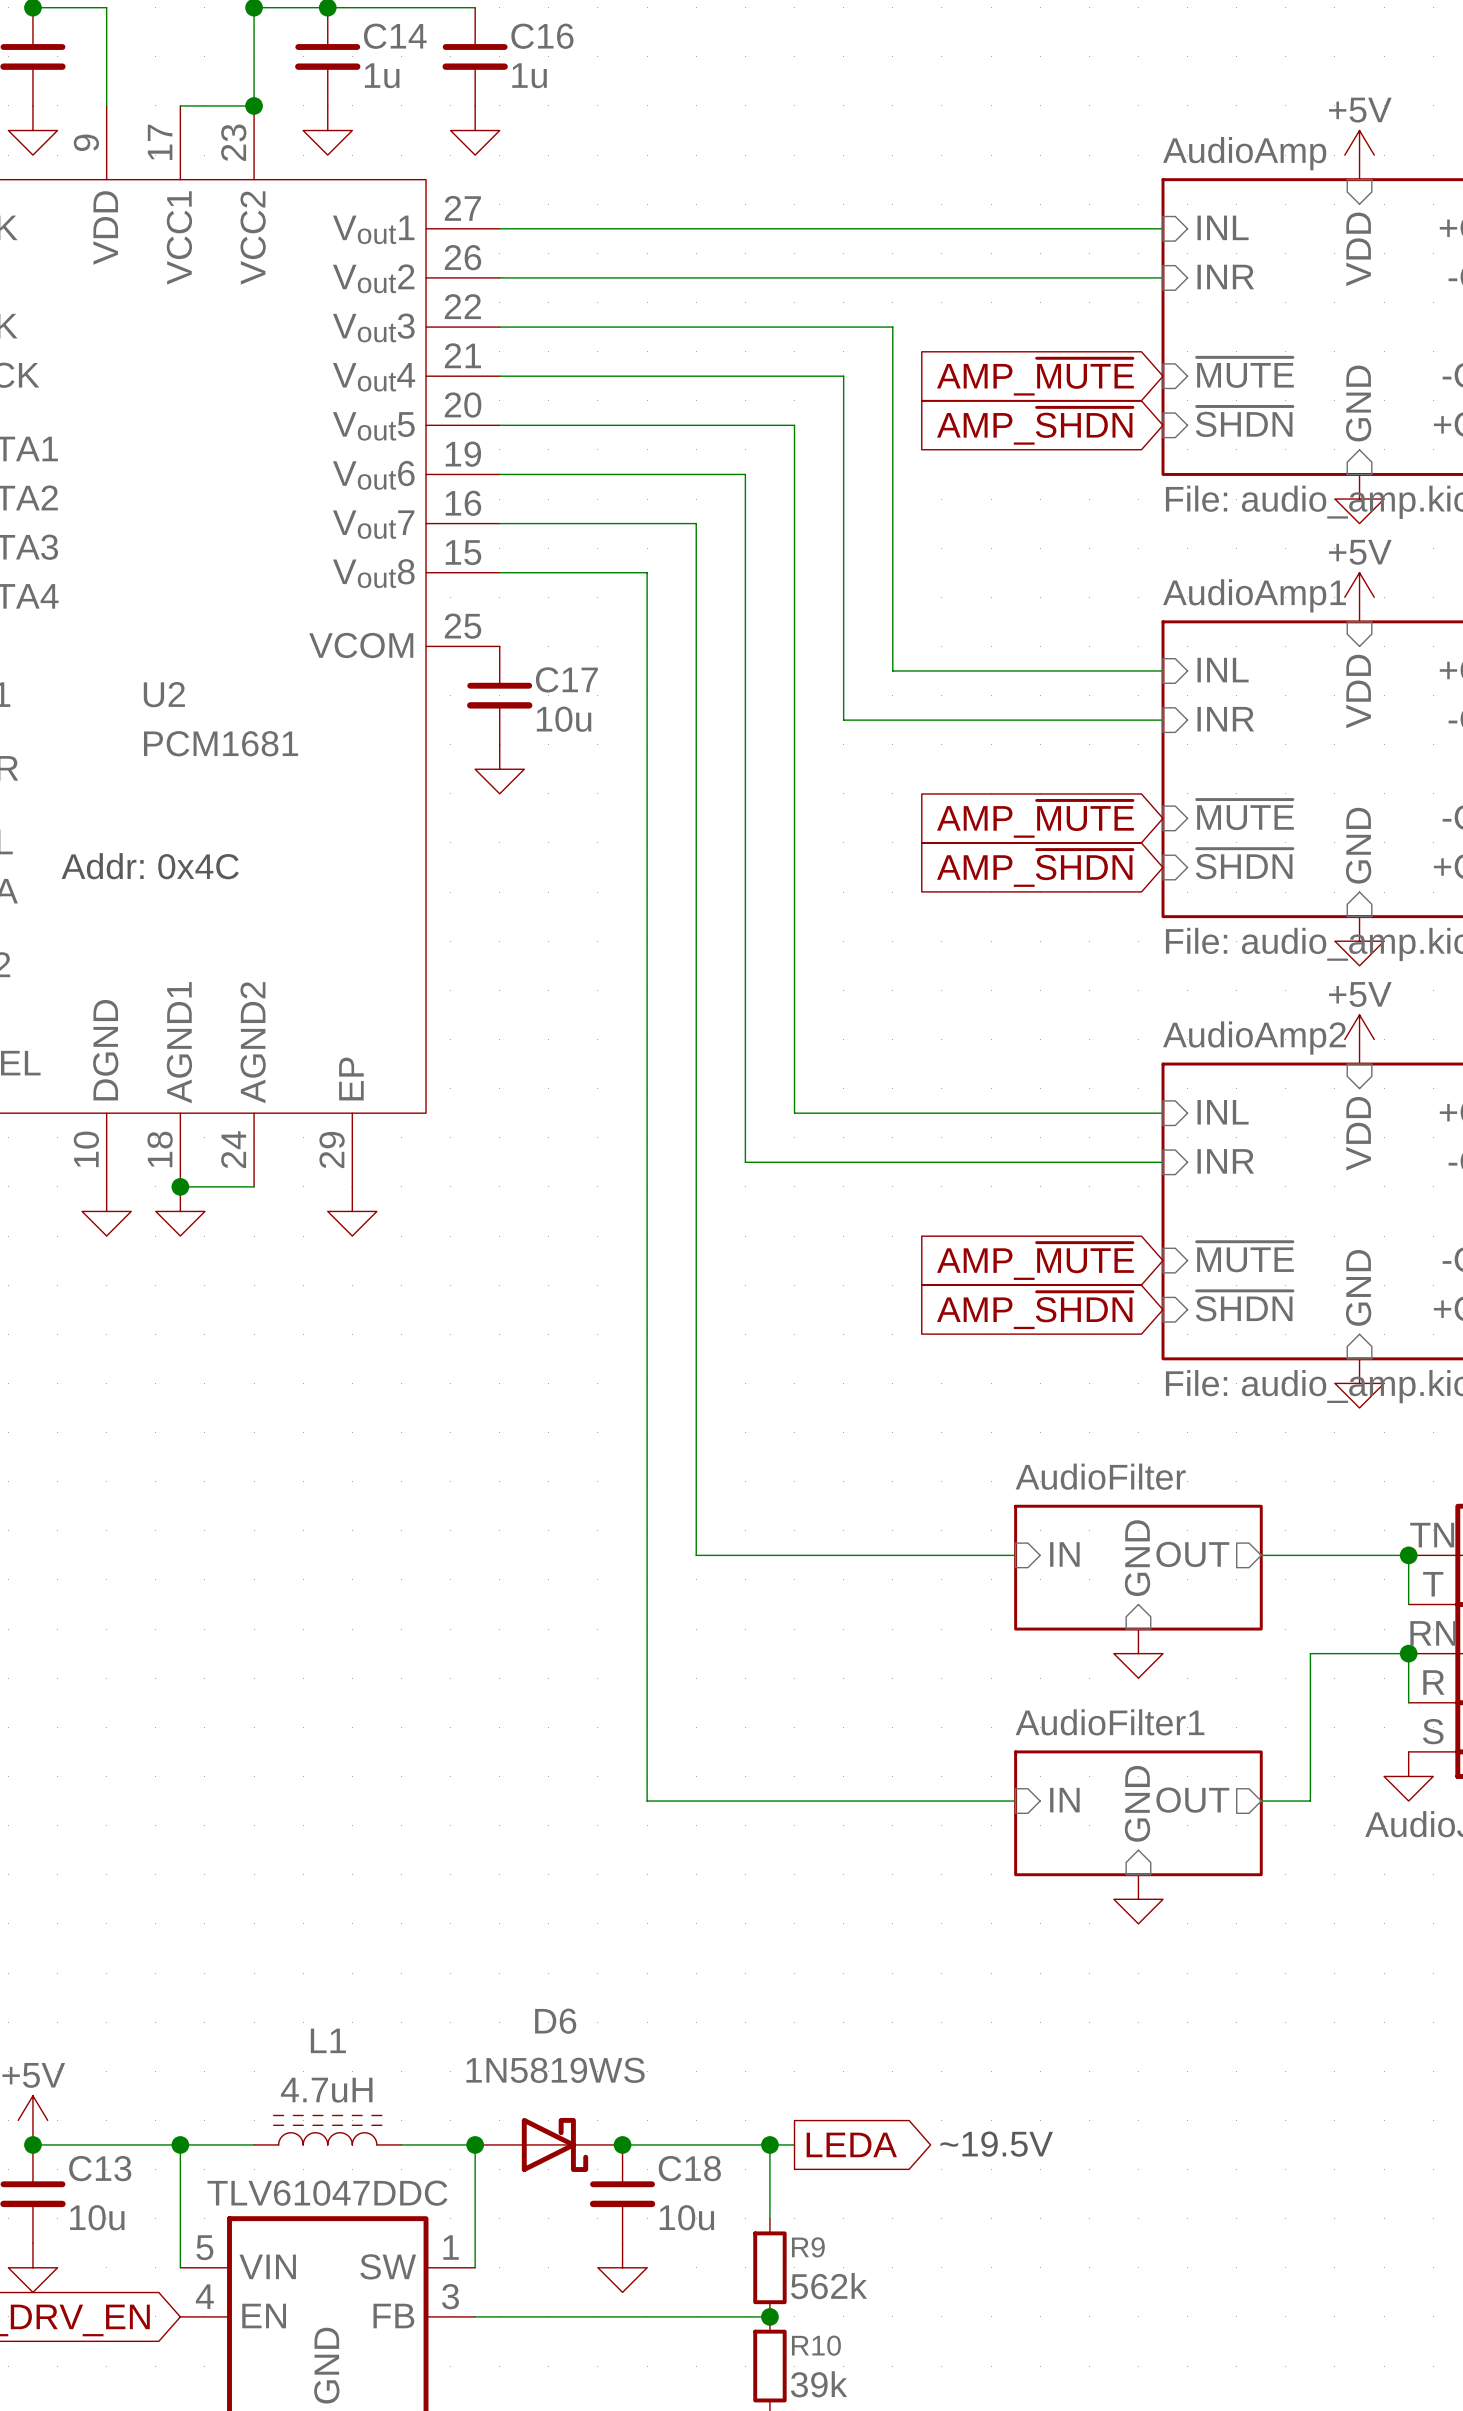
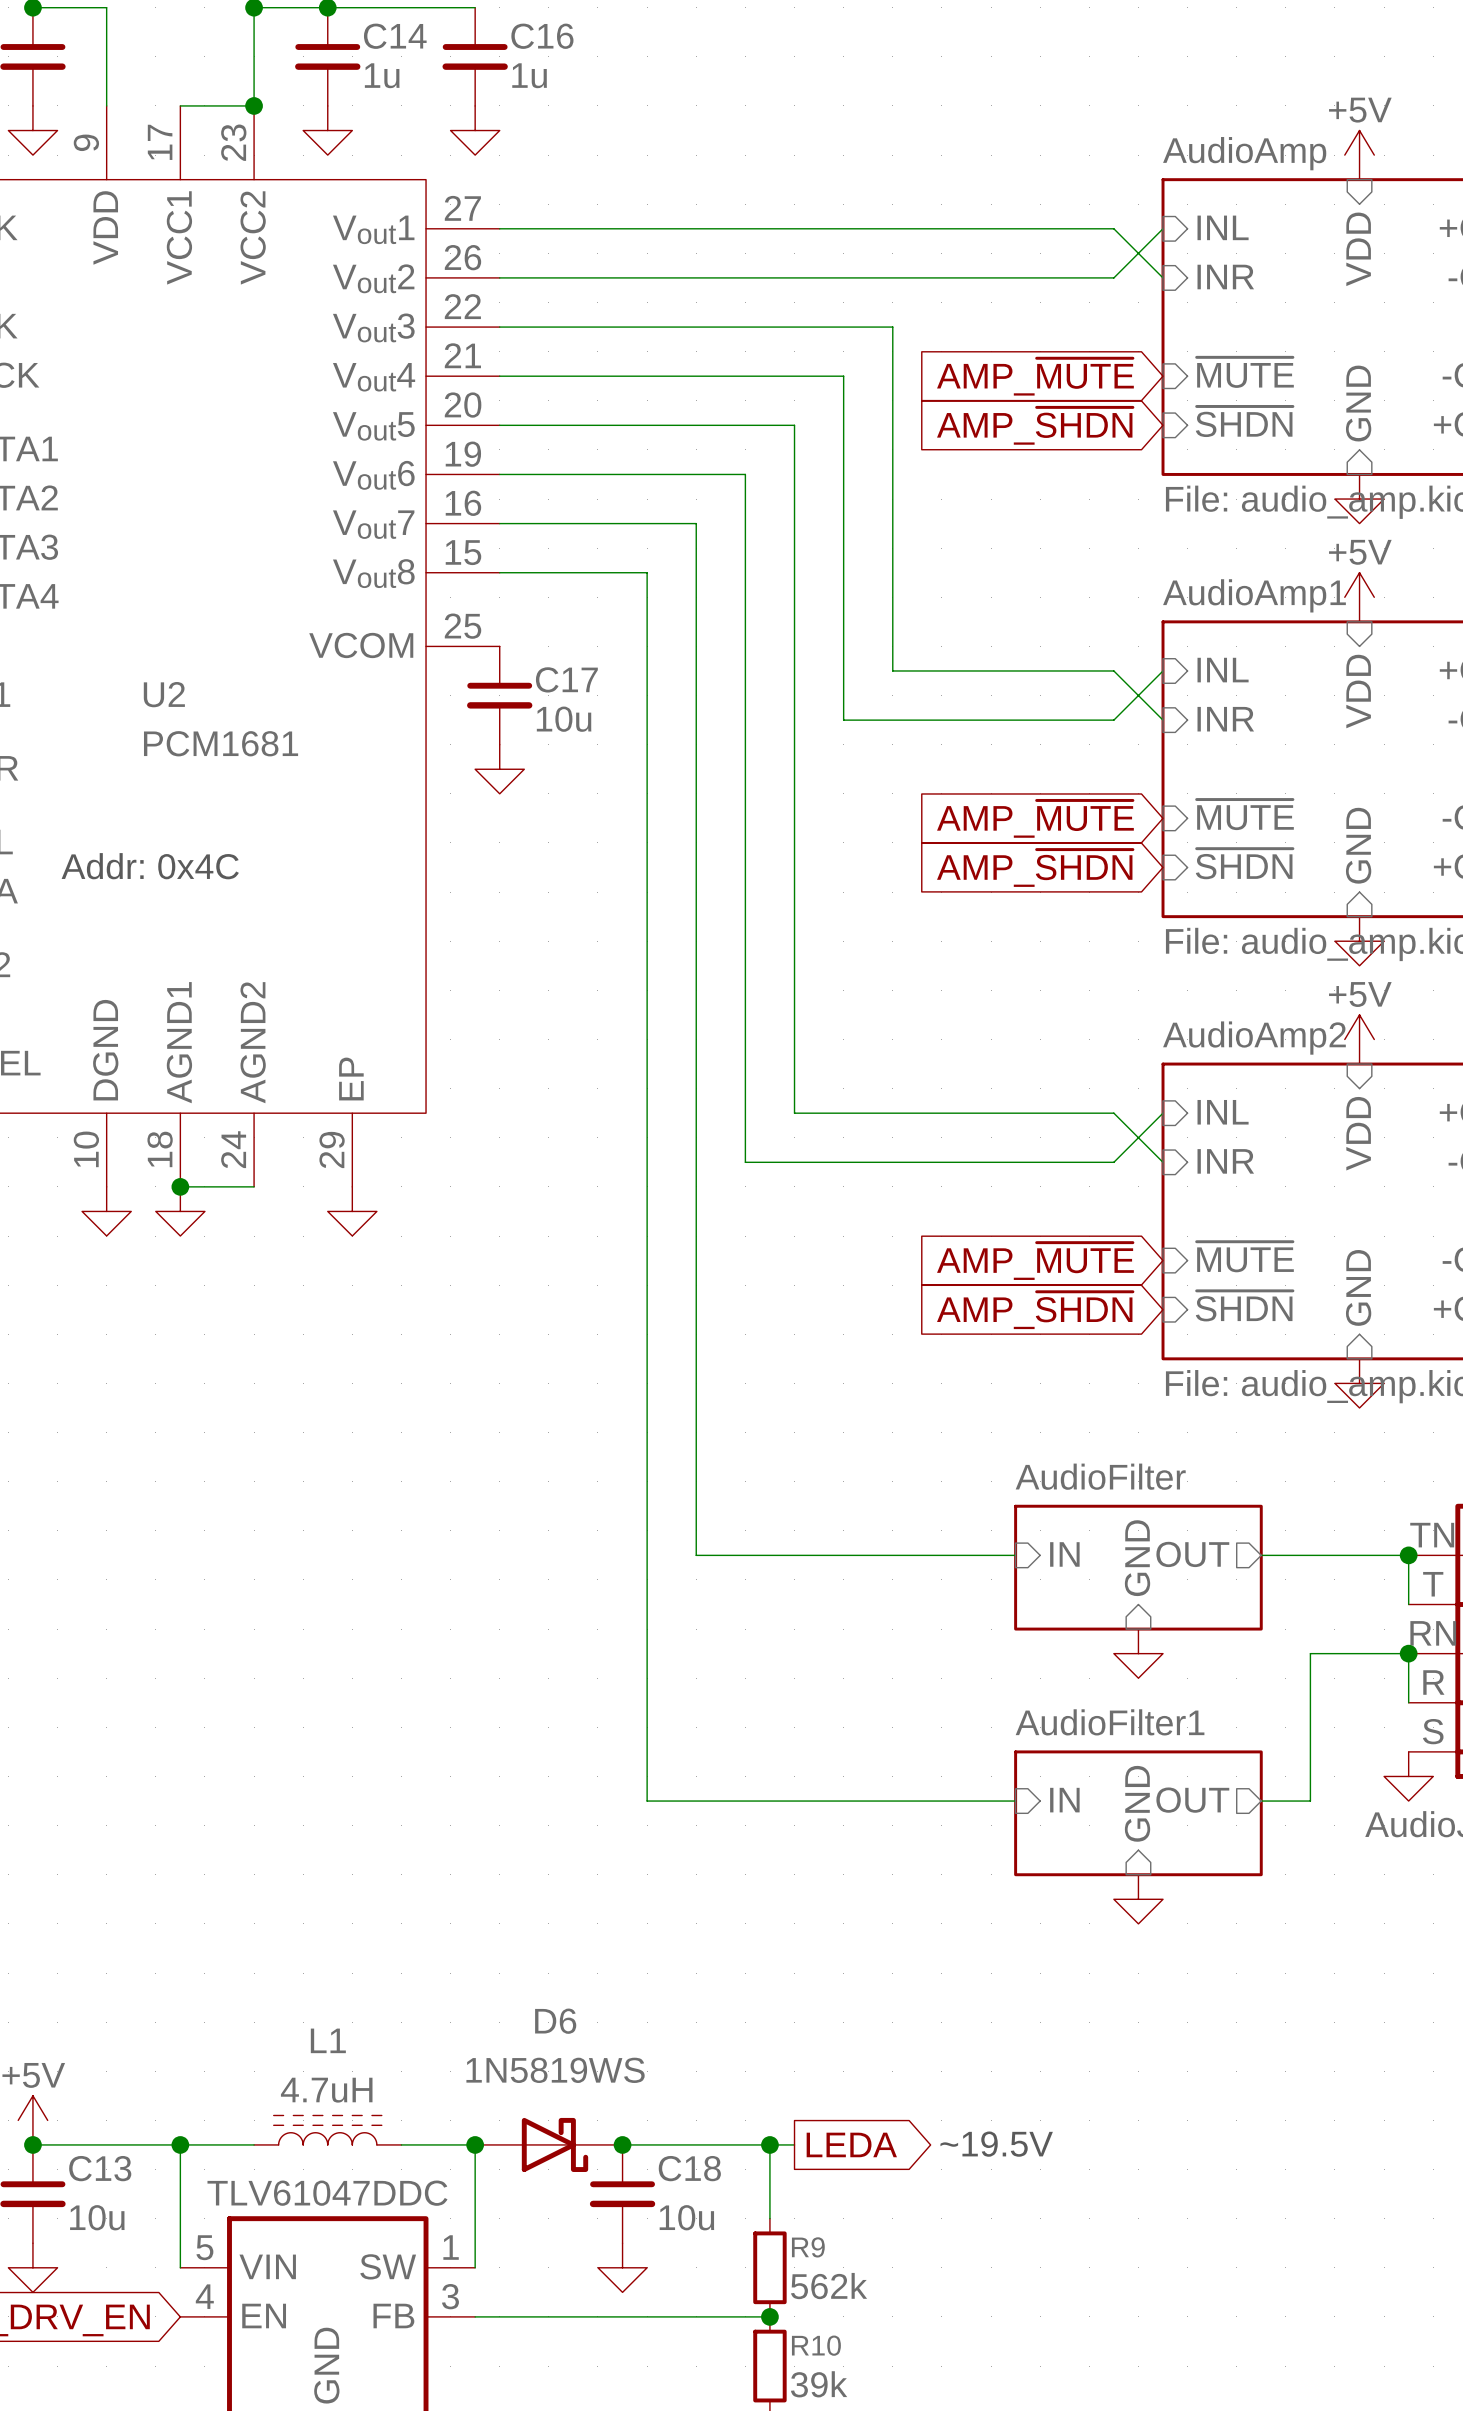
wire: (1113, 228) (1163, 228) -> (1113, 228) (1163, 277)
wire: (1113, 277) (1163, 277) -> (1113, 277) (1163, 228)
wire: (1113, 670) (1163, 670) -> (1113, 670) (1163, 720)
wire: (1113, 720) (1163, 720) -> (1113, 720) (1163, 670)
wire: (1113, 1113) (1163, 1113) -> (1113, 1113) (1163, 1162)
wire: (1113, 1162) (1163, 1162) -> (1113, 1162) (1163, 1113)

